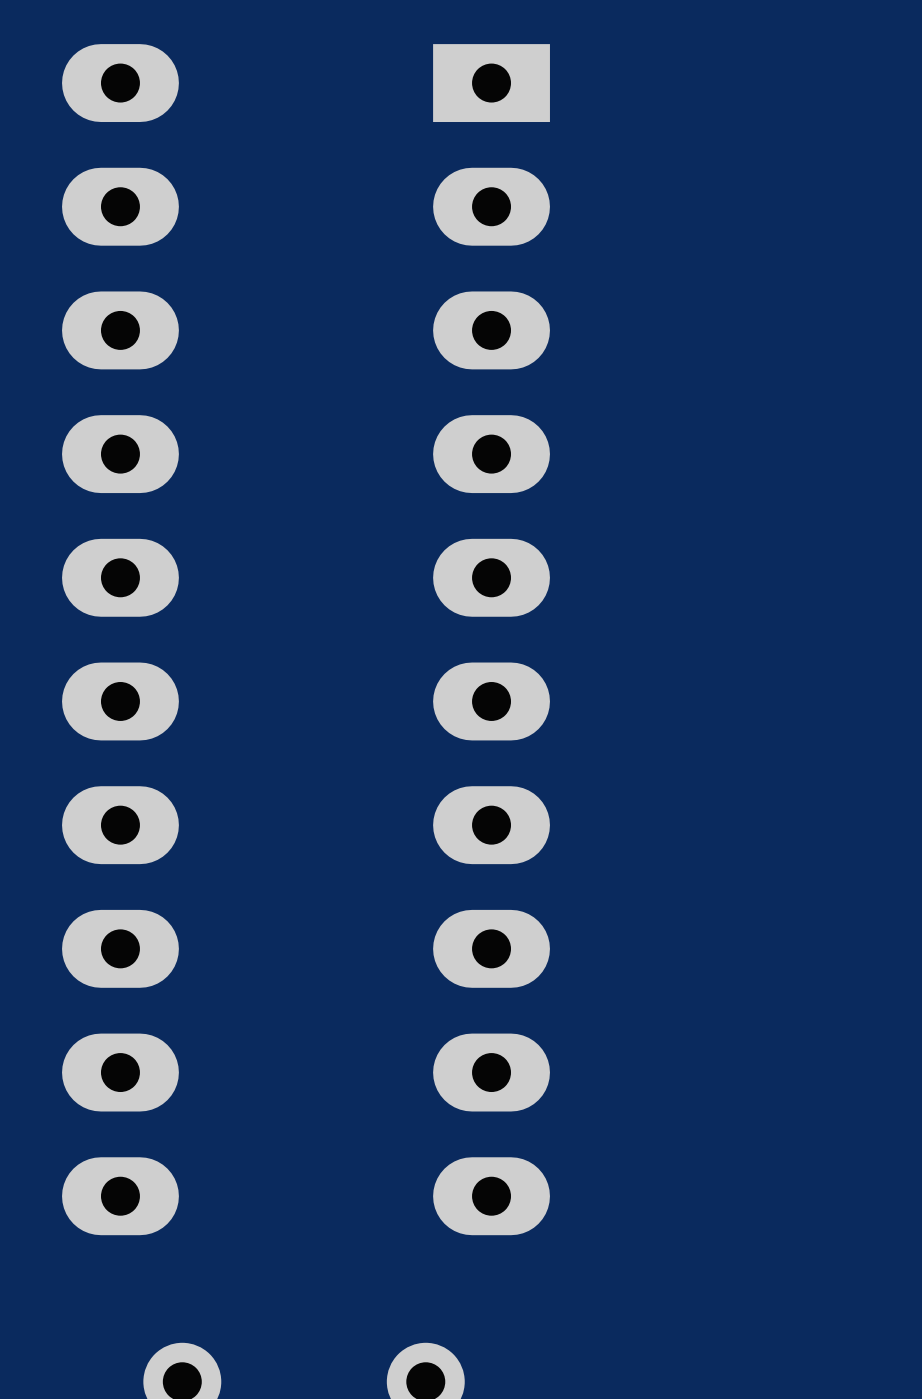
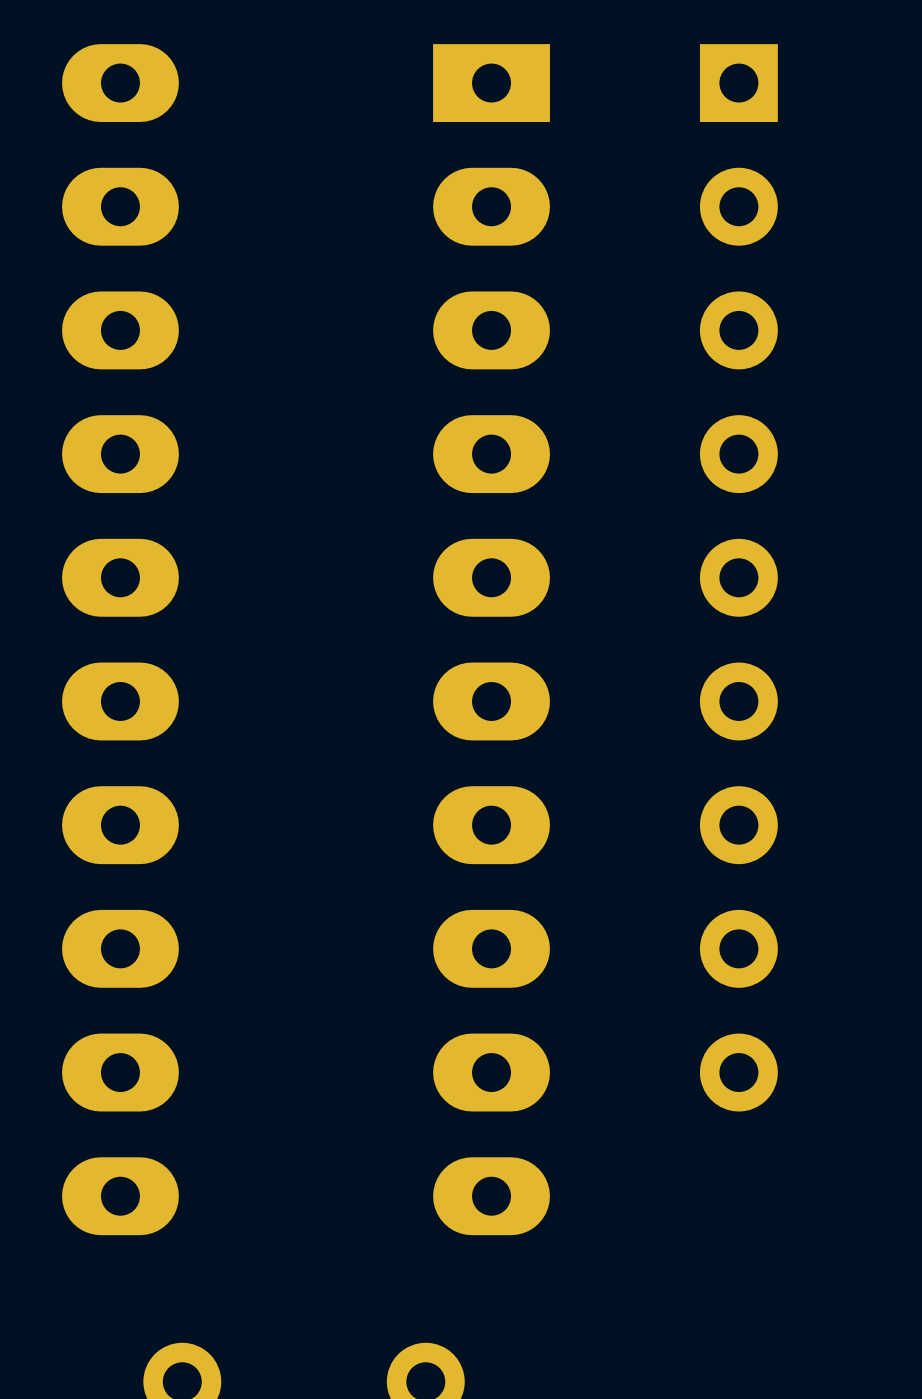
part: none -> (738, 577)

